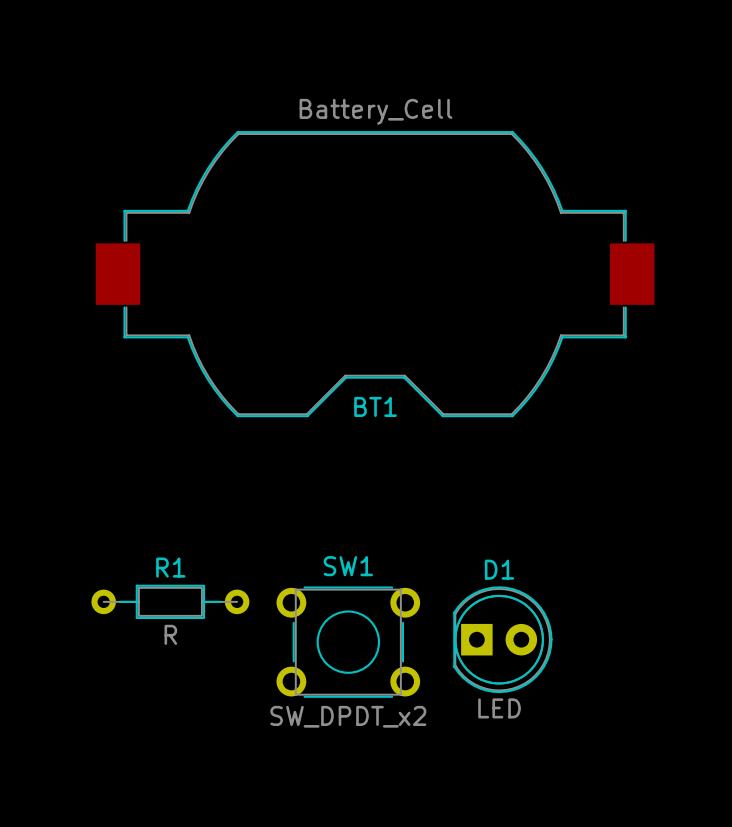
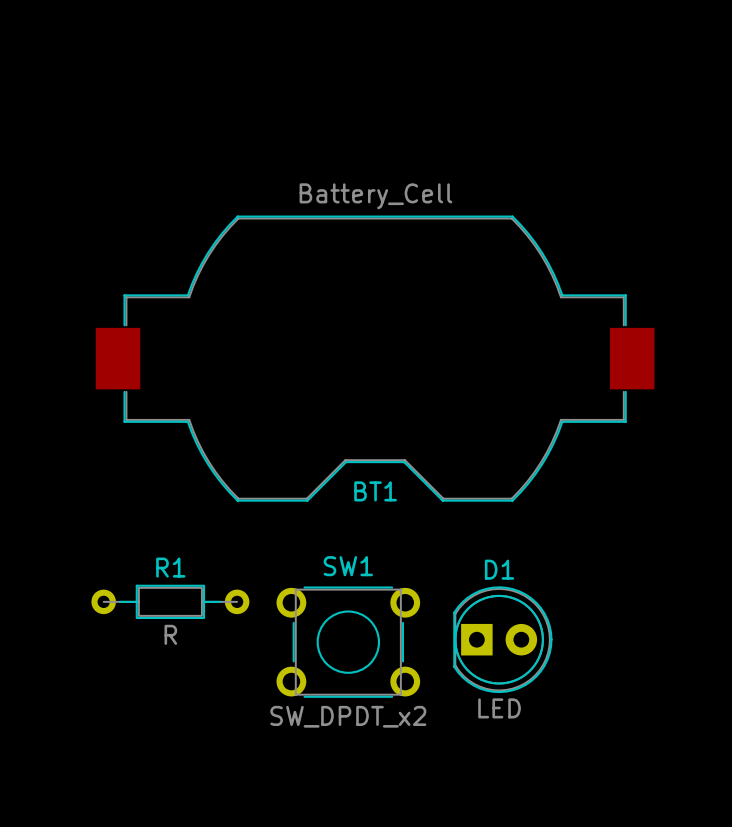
BT1 position: (375, 274) -> (375, 358)

